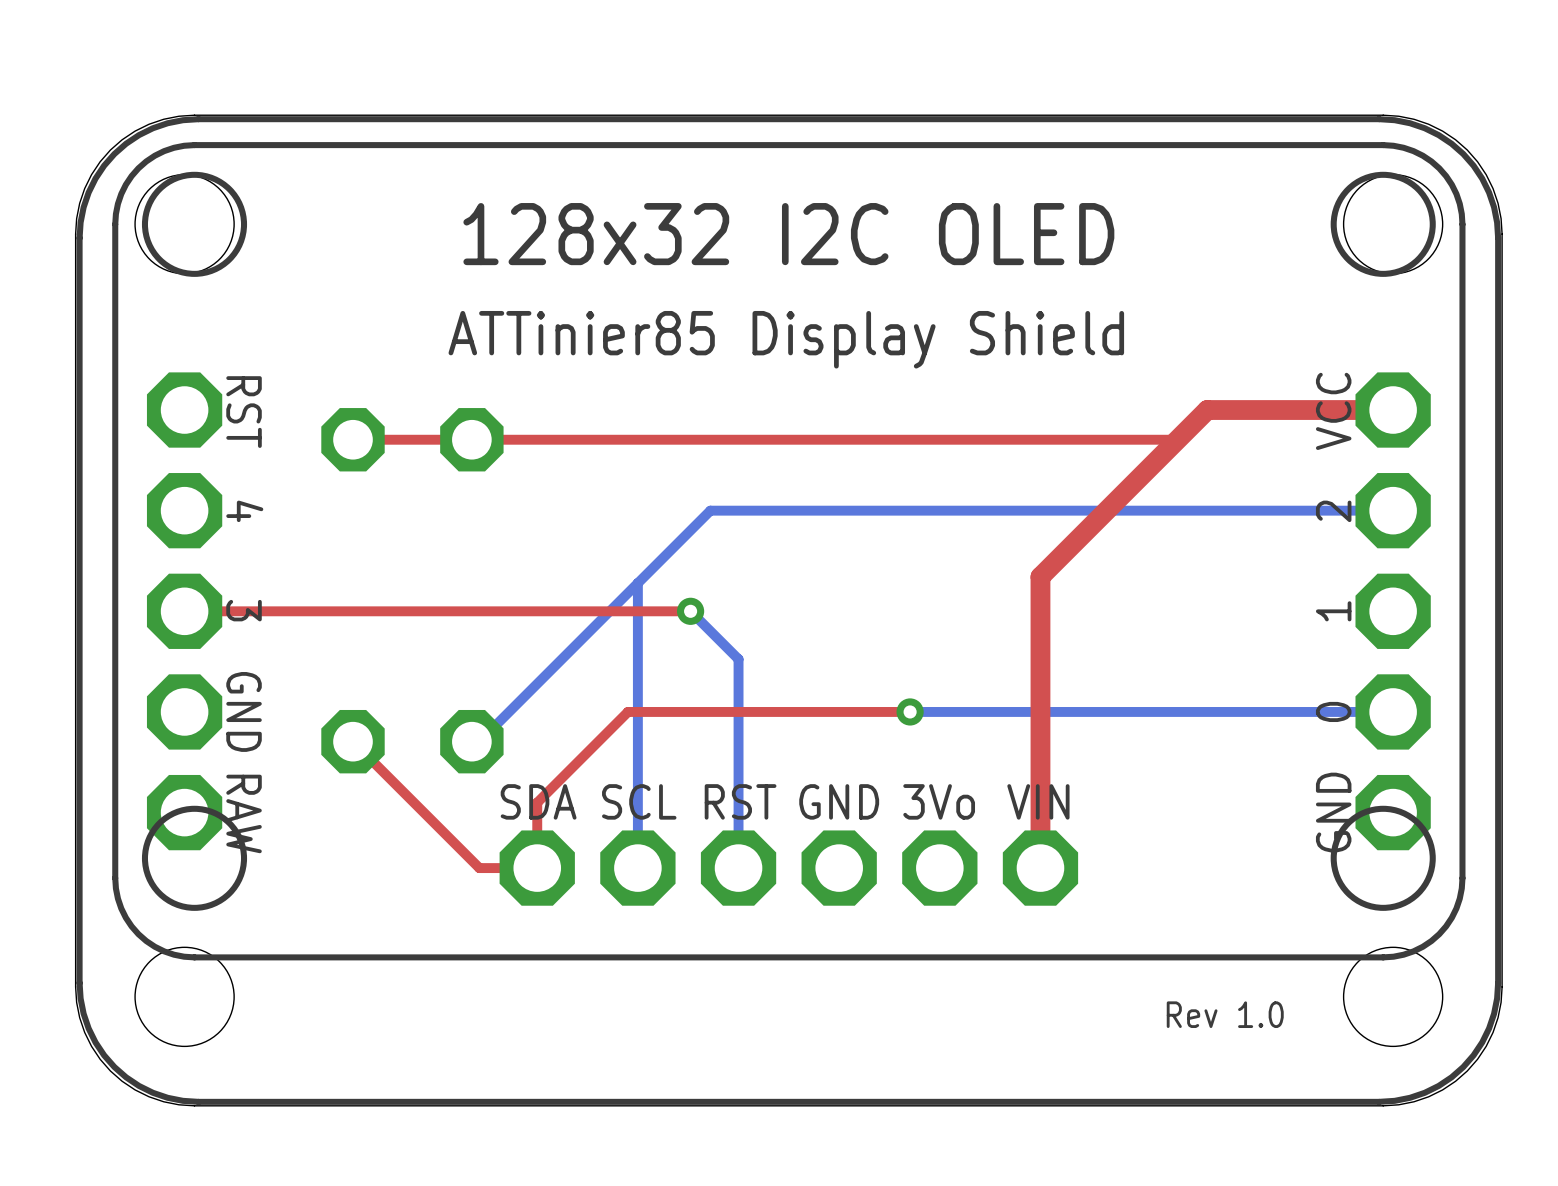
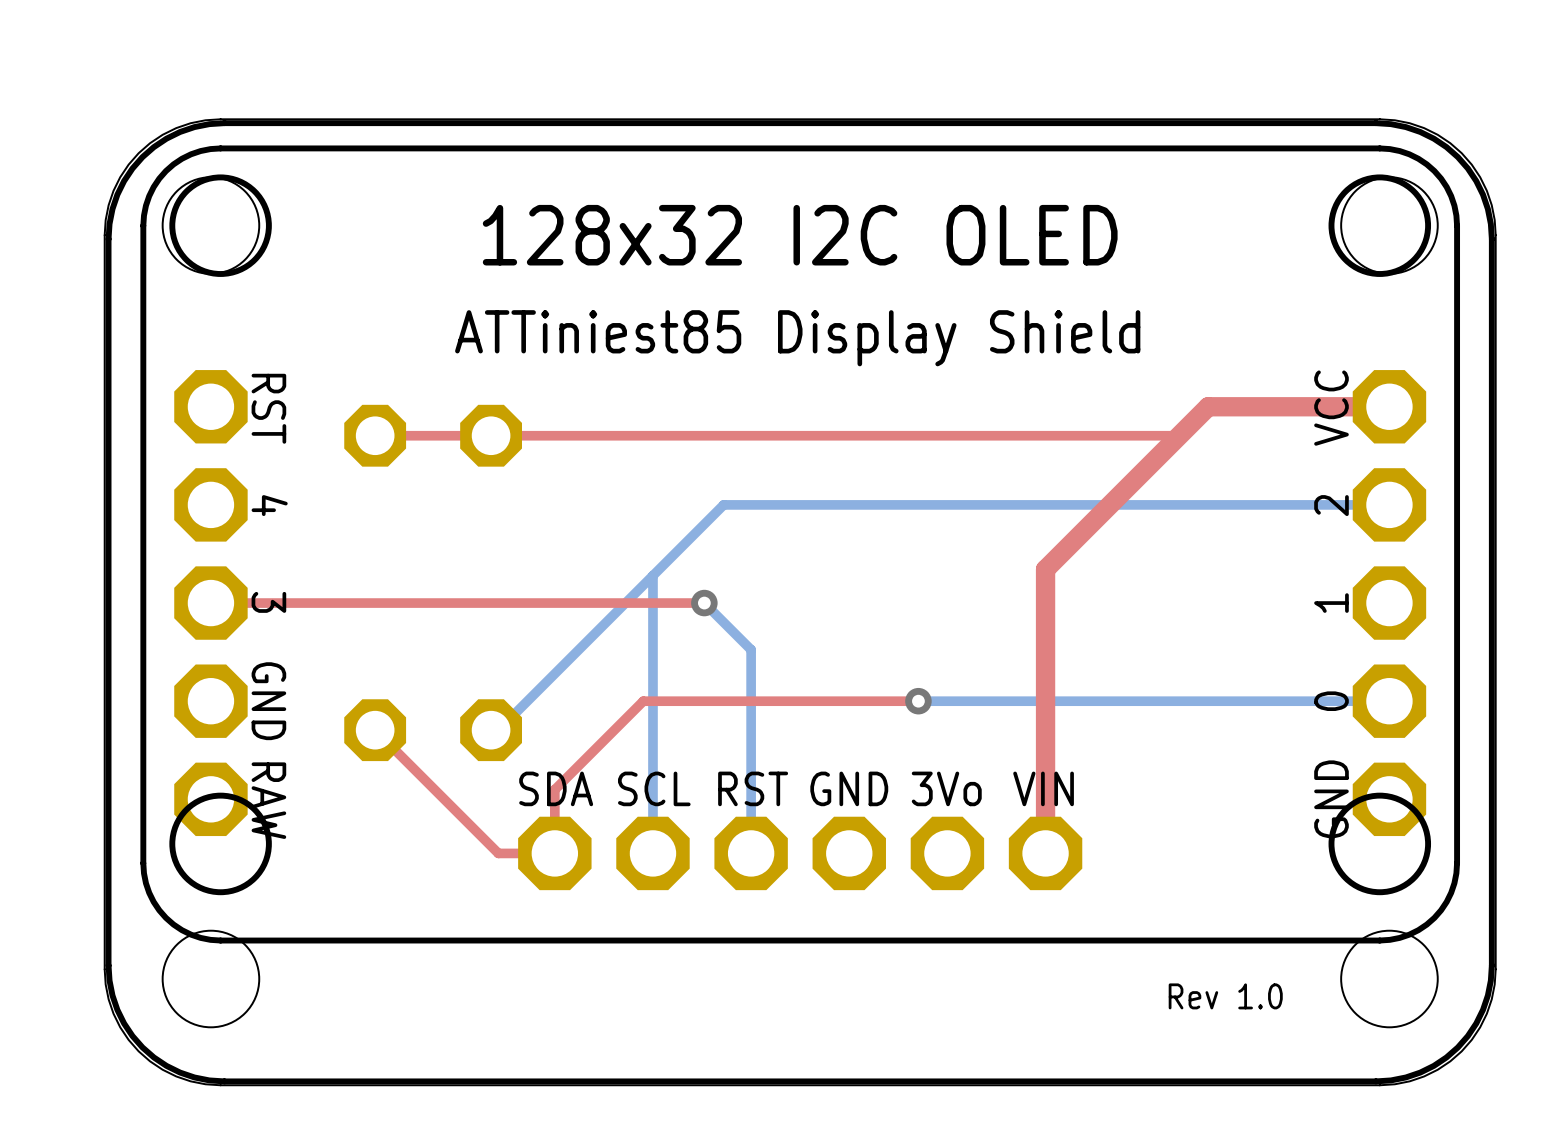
text: ATTinier85 Display Shield (786, 339) -> ATTiniest85 Display Shield (797, 338)

